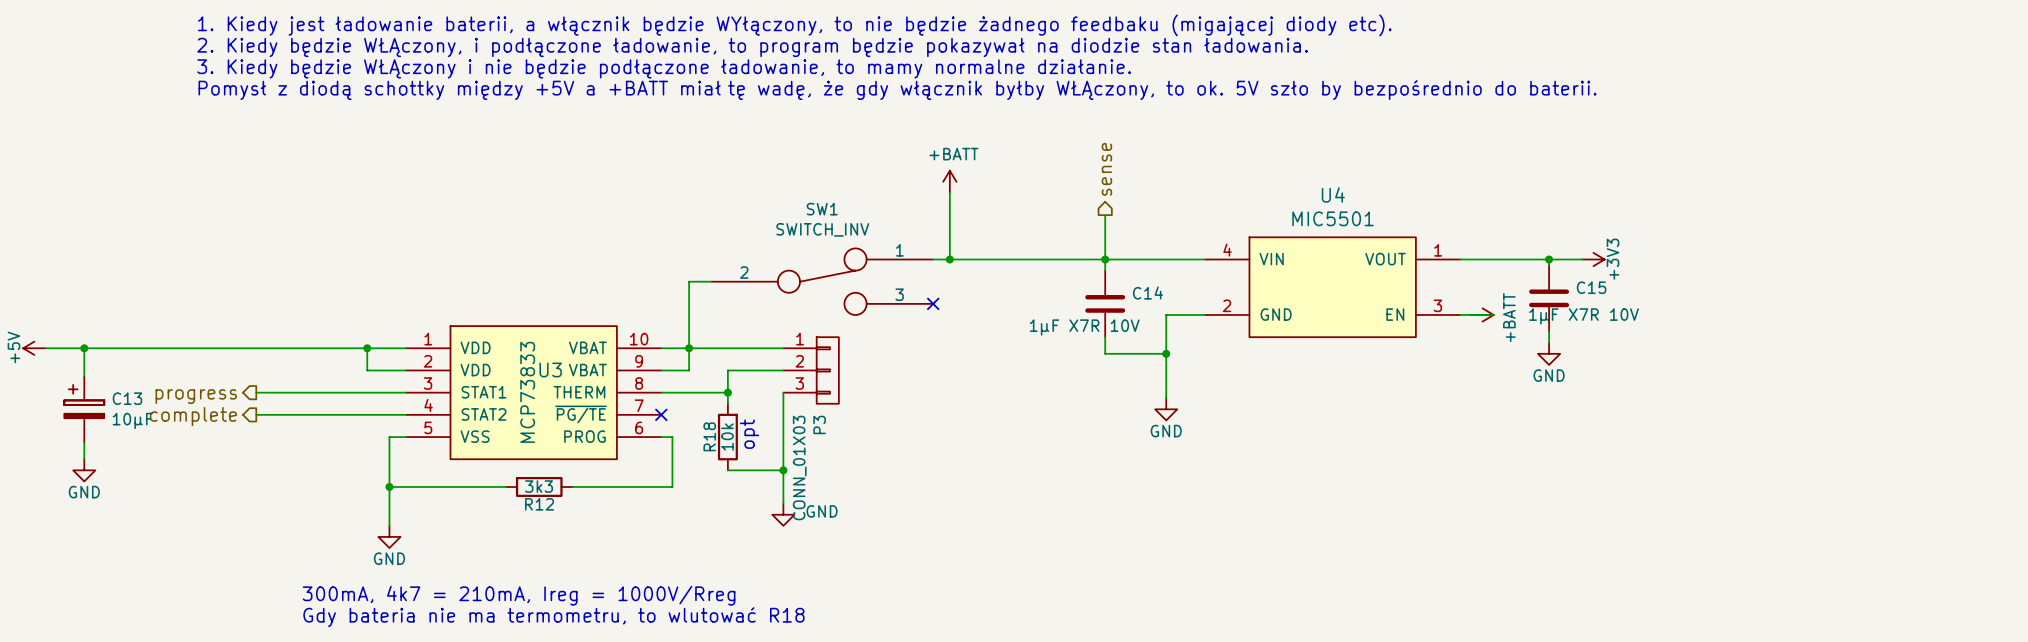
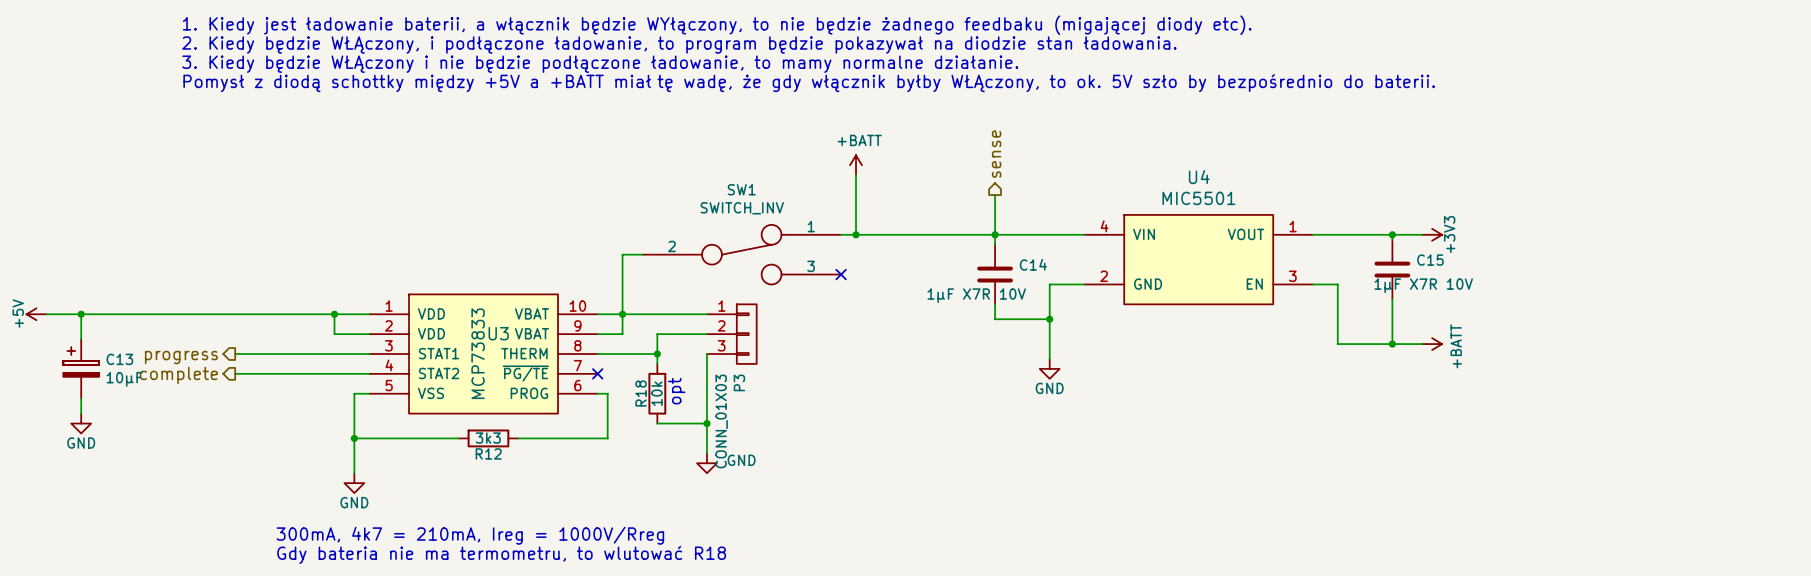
power symbol position: +BATT (1482, 314) -> +BATT (1432, 344)
wire: (1488, 314) (1493, 314) -> (1337, 284) (1337, 344) (1422, 344)
wire: none -> (1392, 309) (1392, 344)
power symbol: GND (1549, 353) -> none
junction: none -> (1392, 344)

